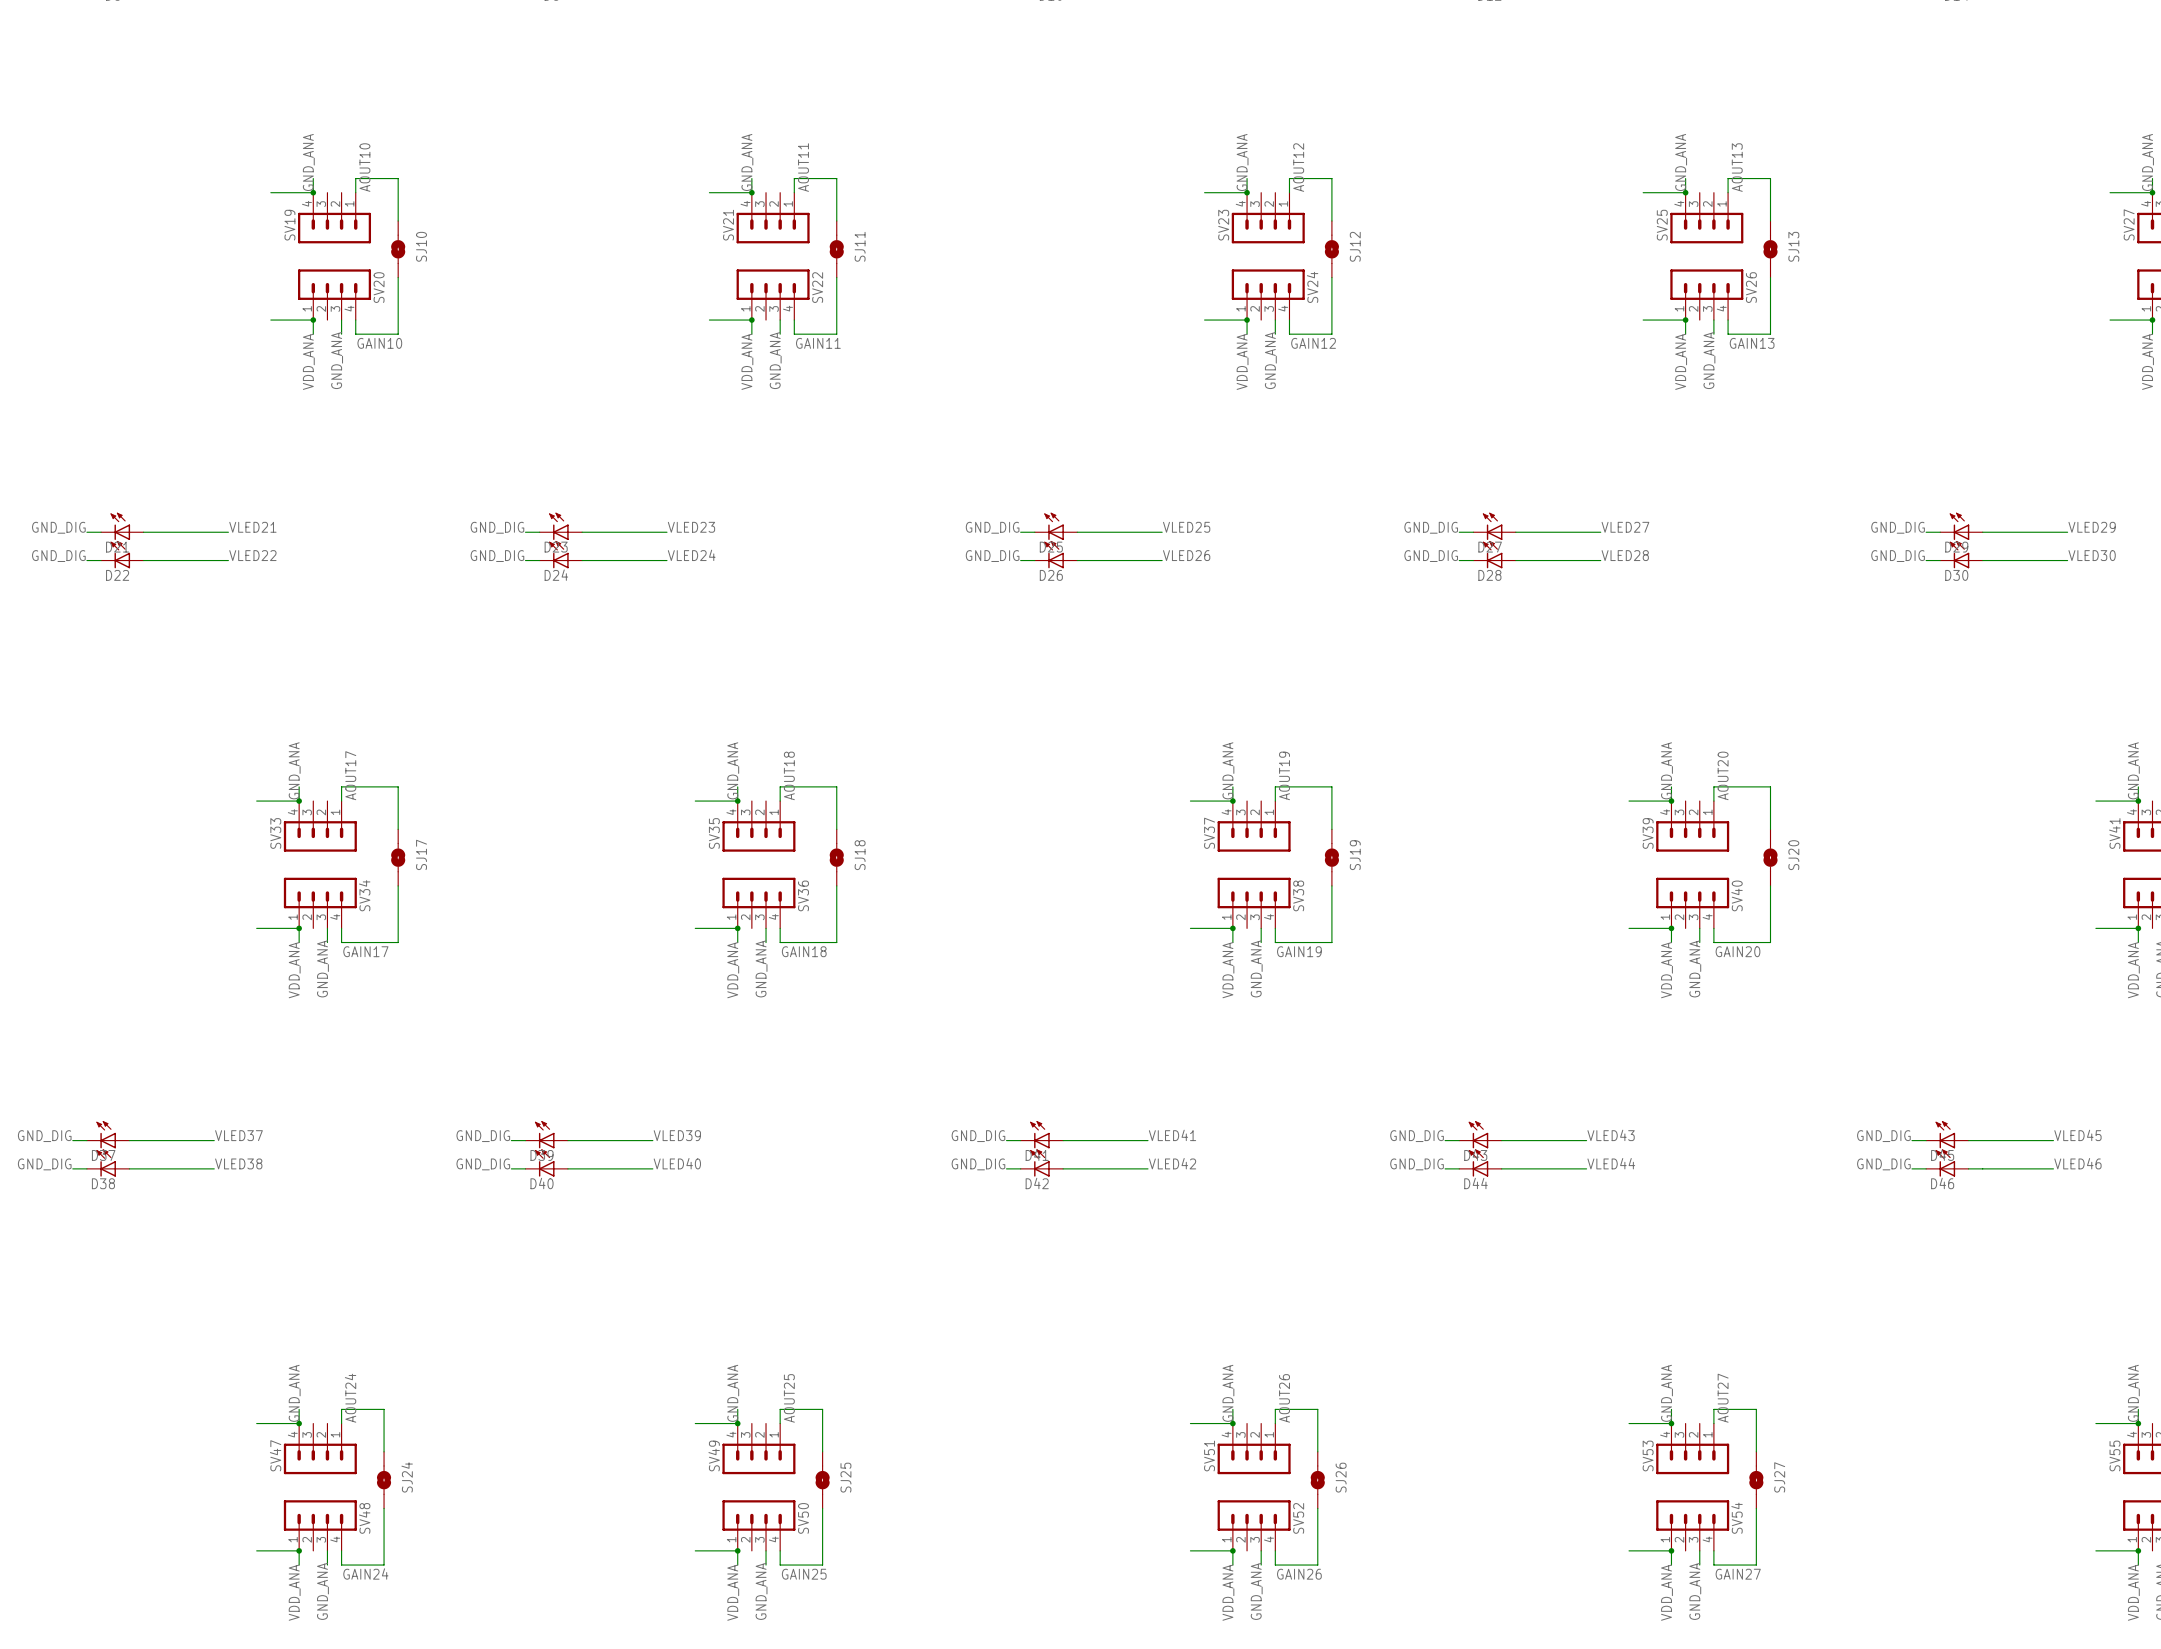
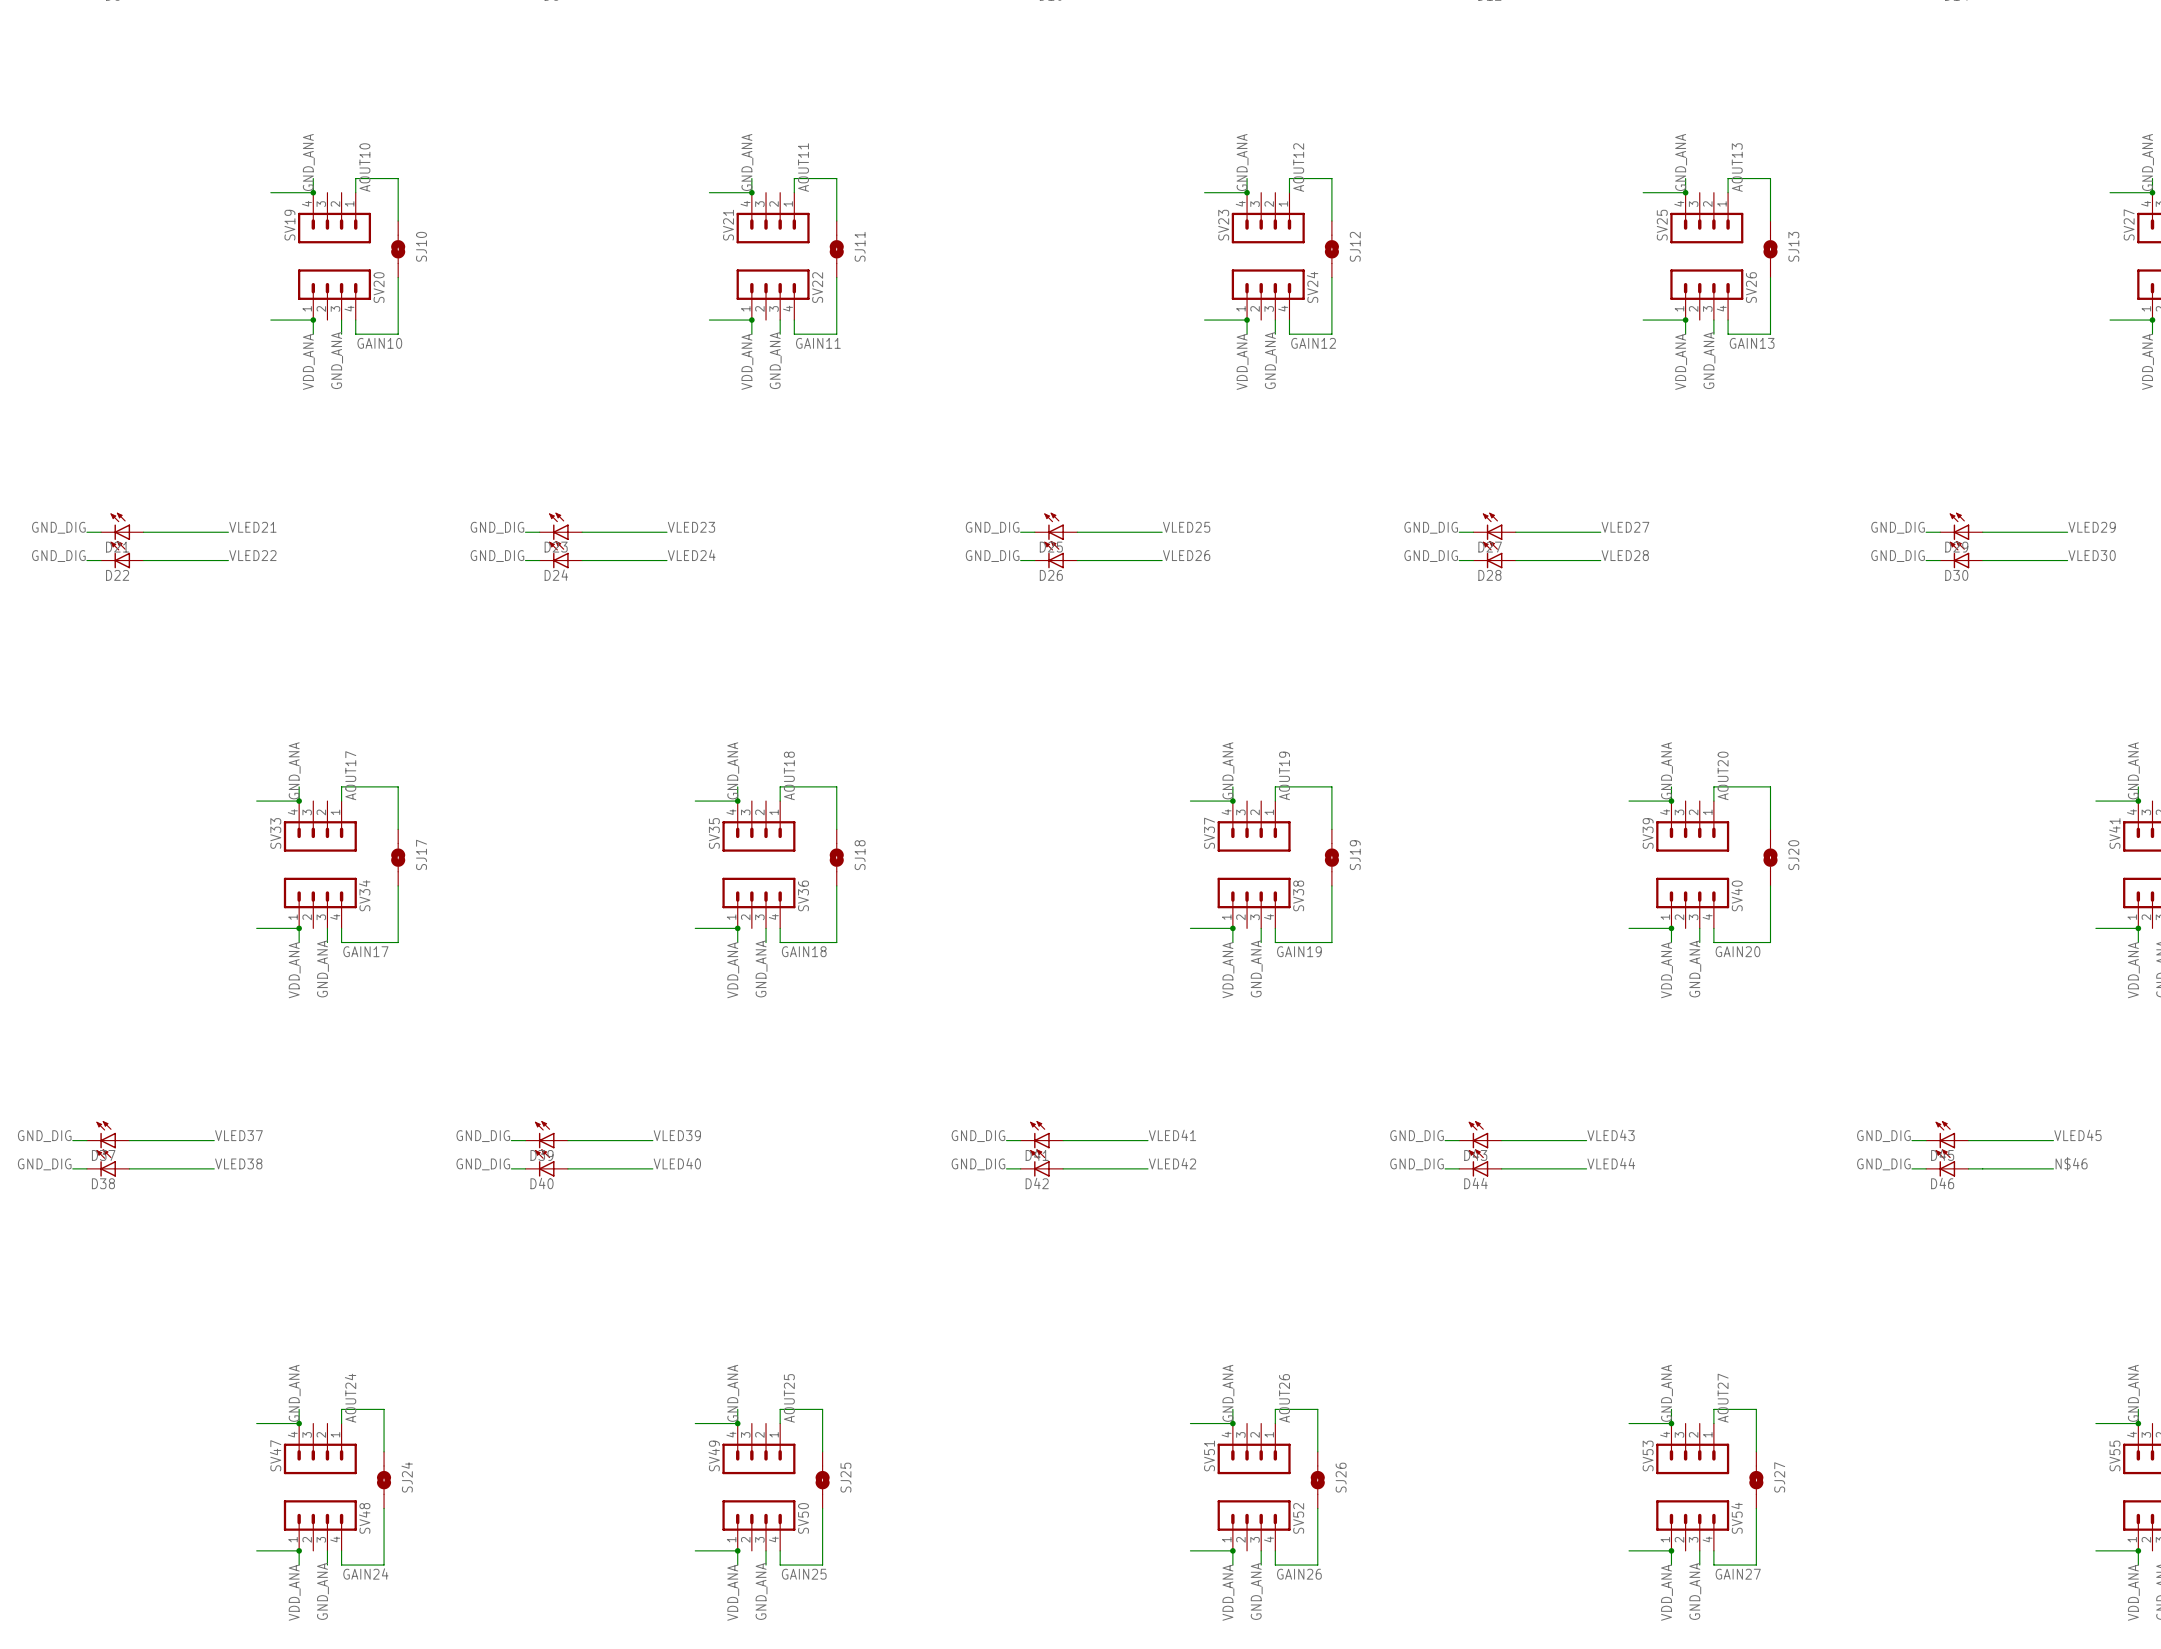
label: VLED46 (2077, 1163) -> N$46 (2071, 1163)

